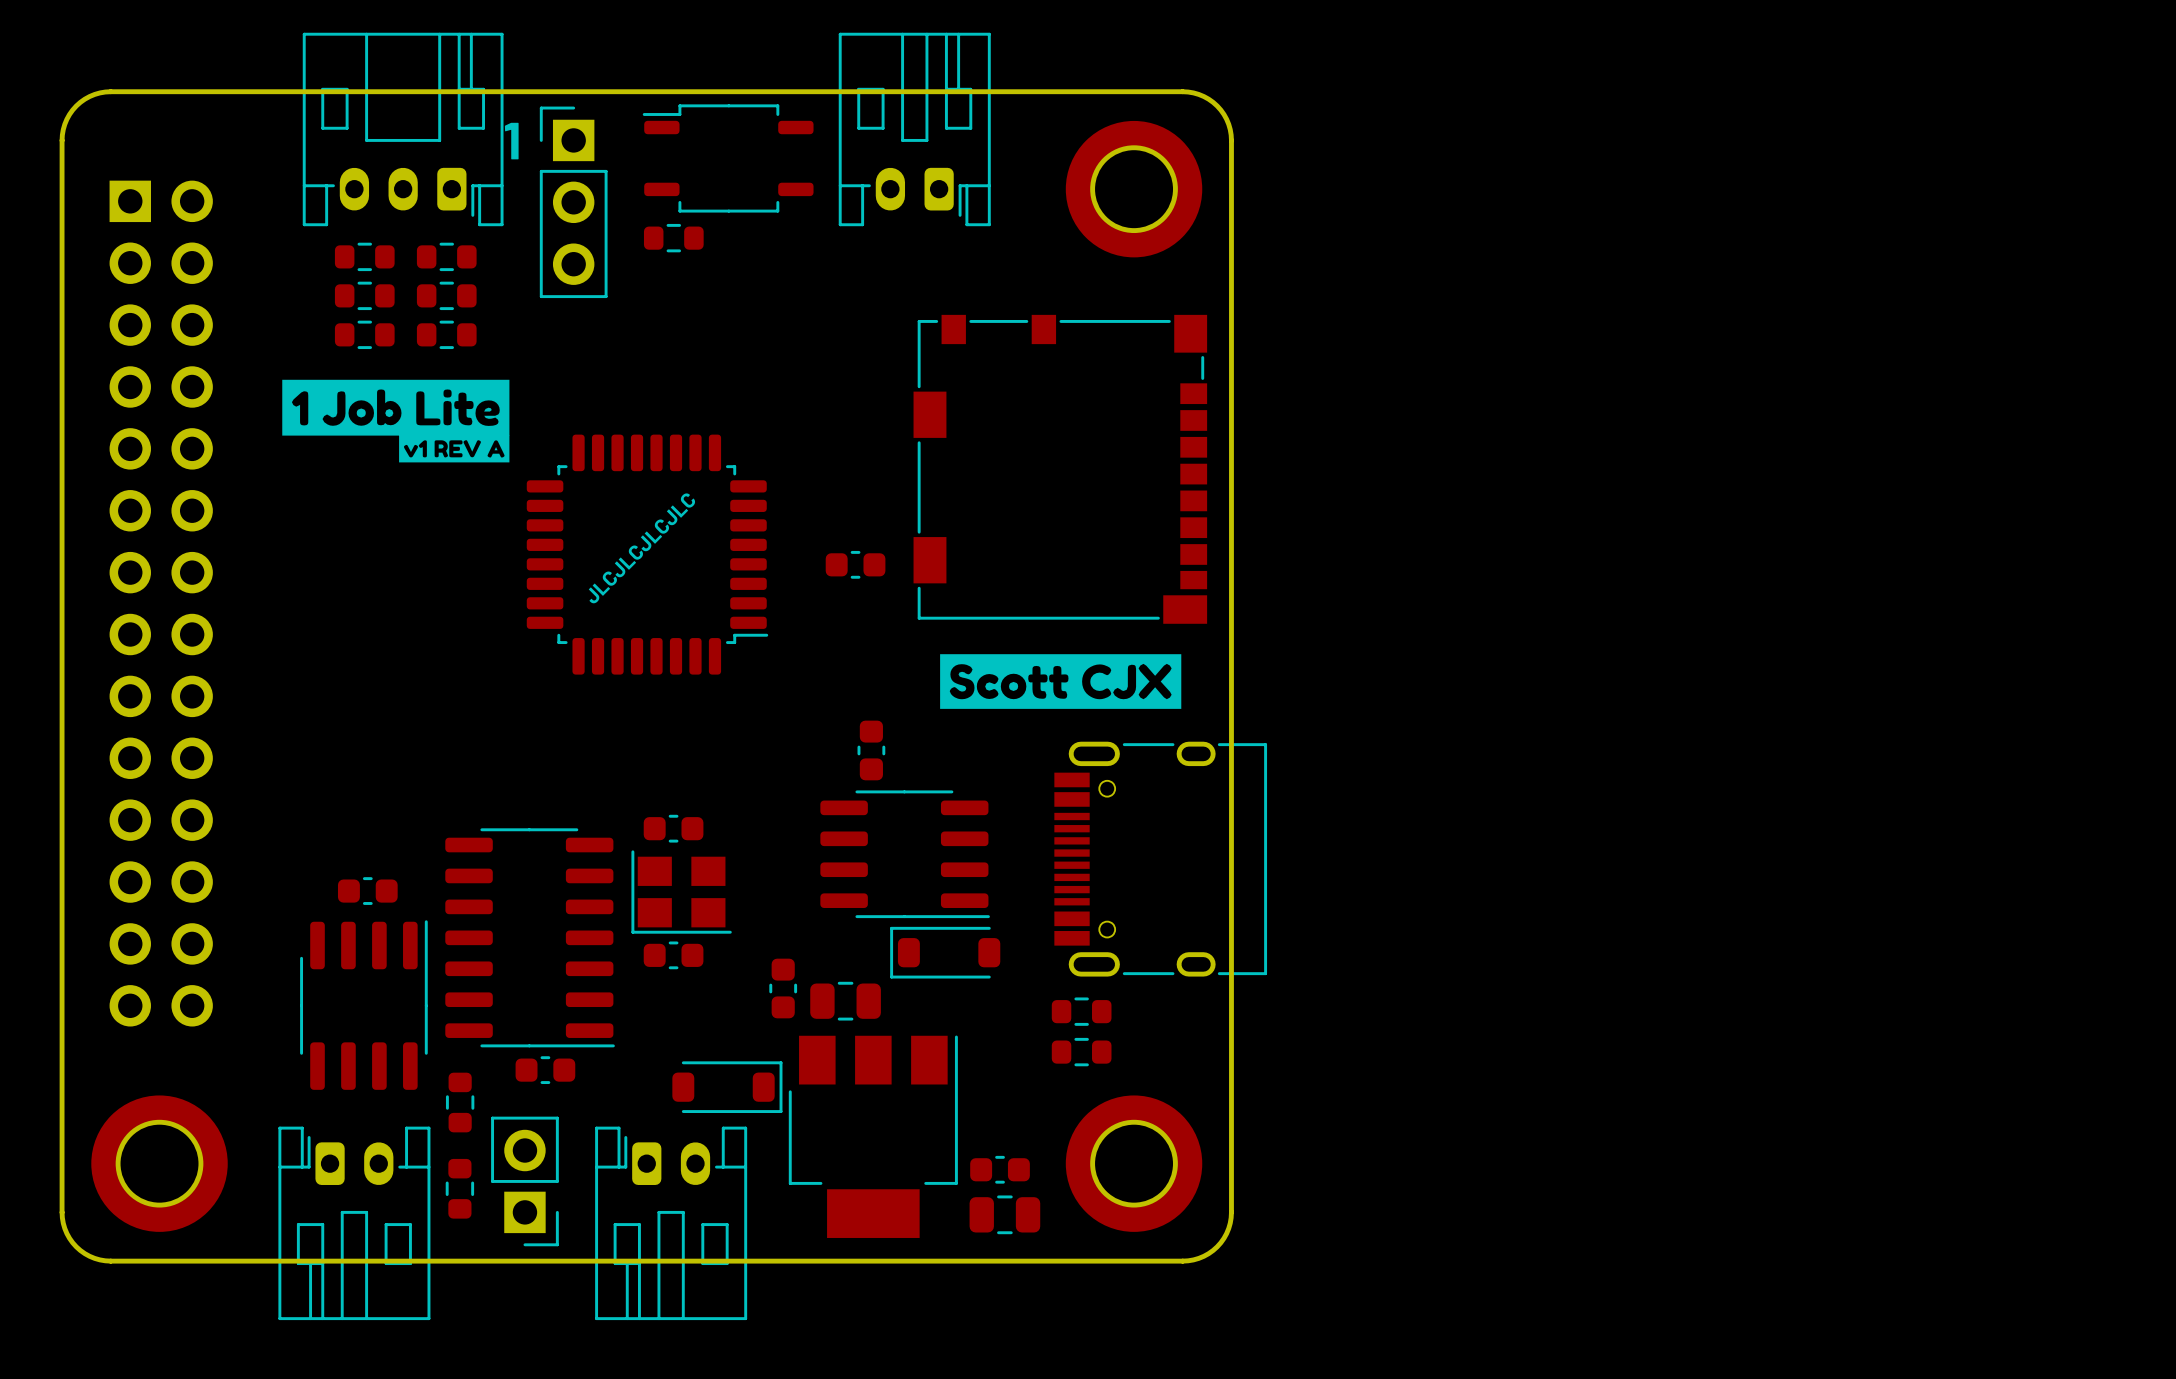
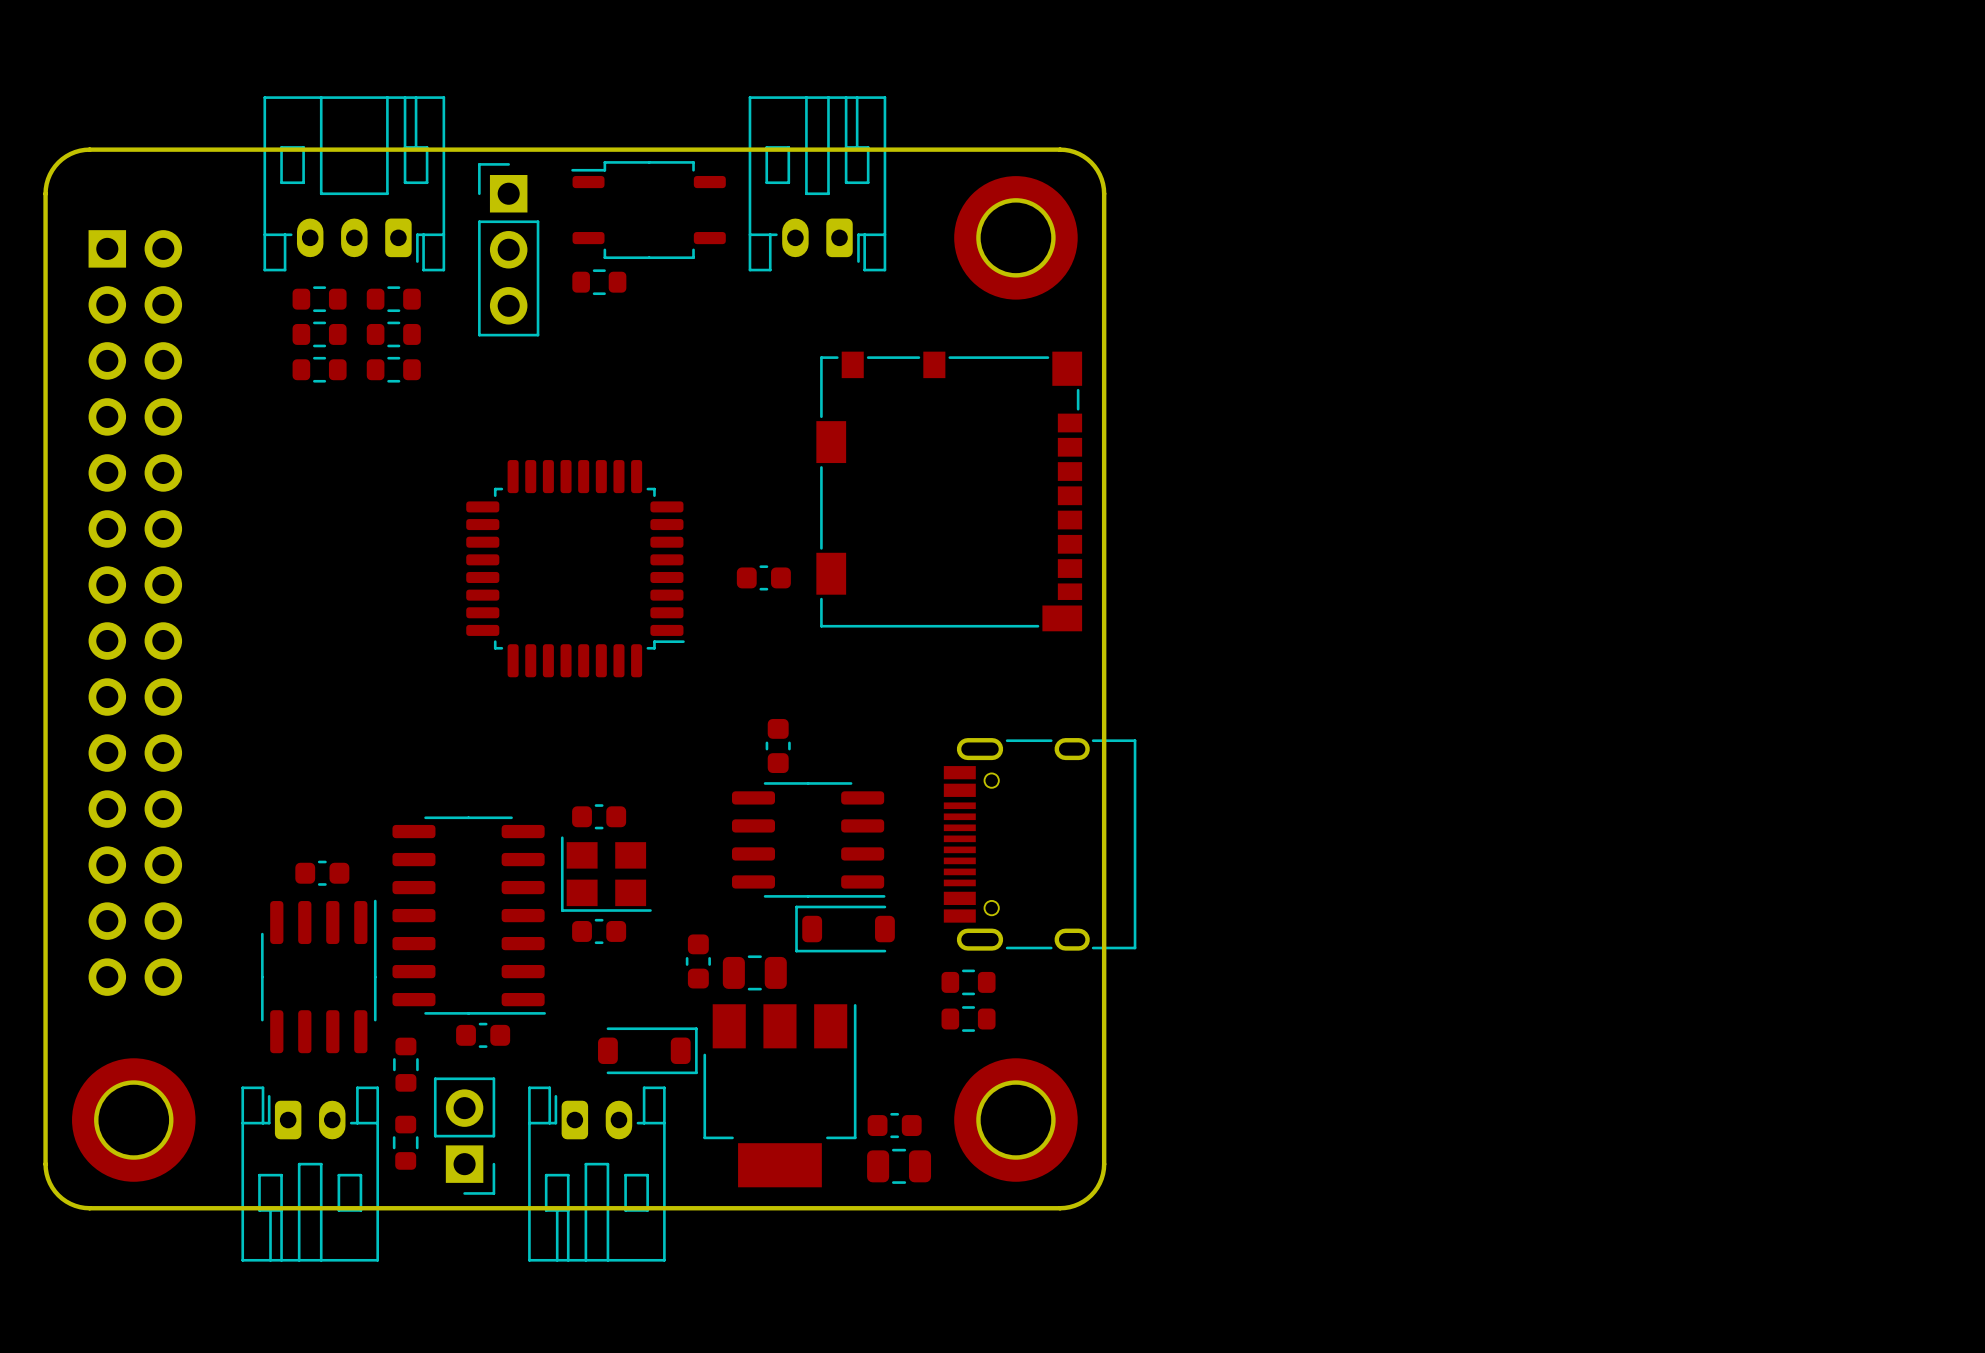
text: 1 (511, 141) -> none
drawing: [282, 379, 510, 463] -> none
text: JLCJLCJLCJLC (642, 548) -> none
drawing: [940, 654, 1182, 709] -> none

